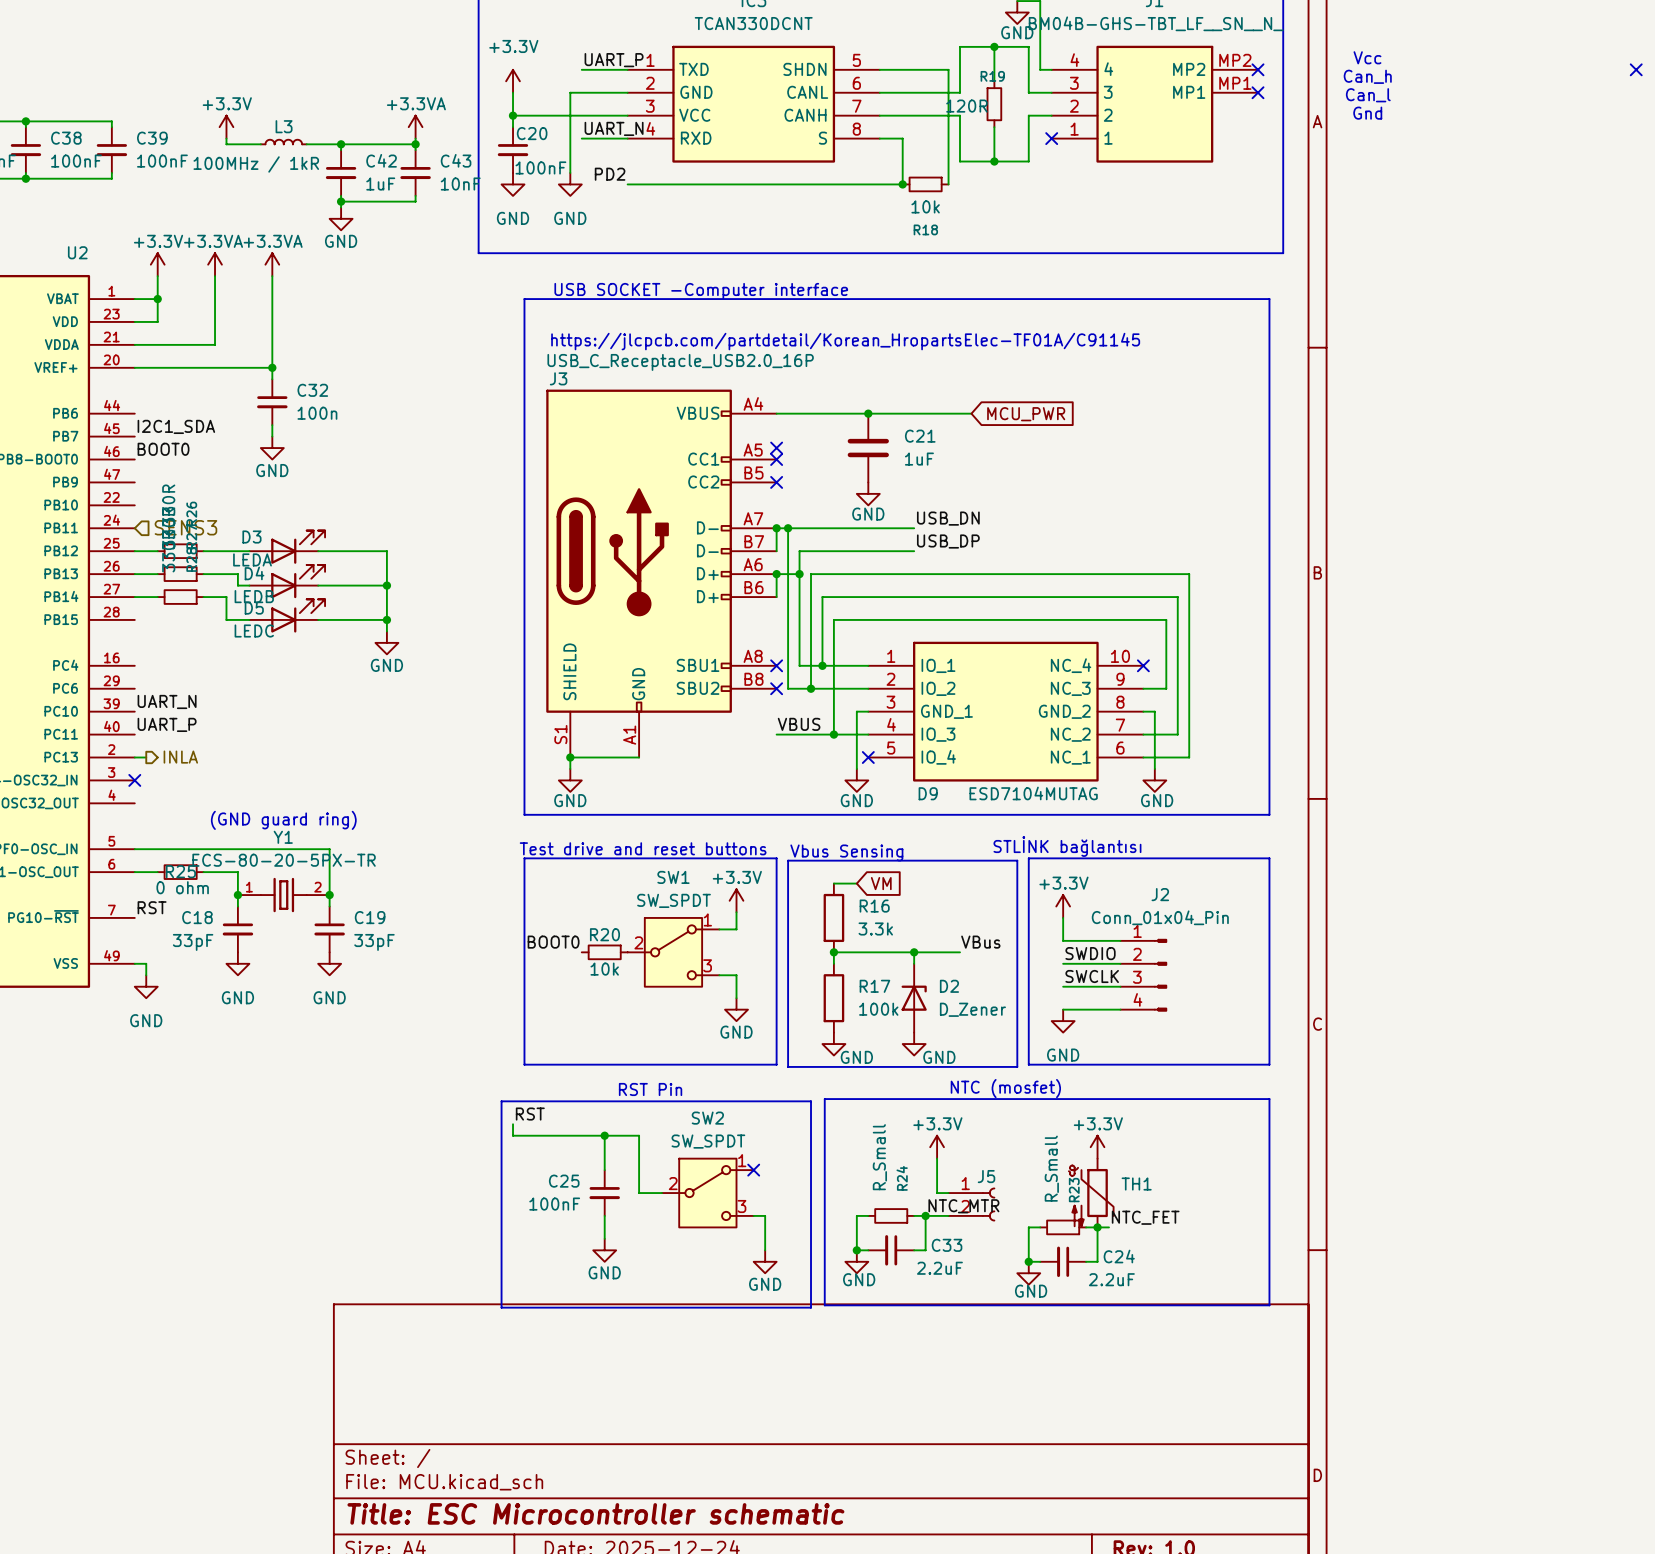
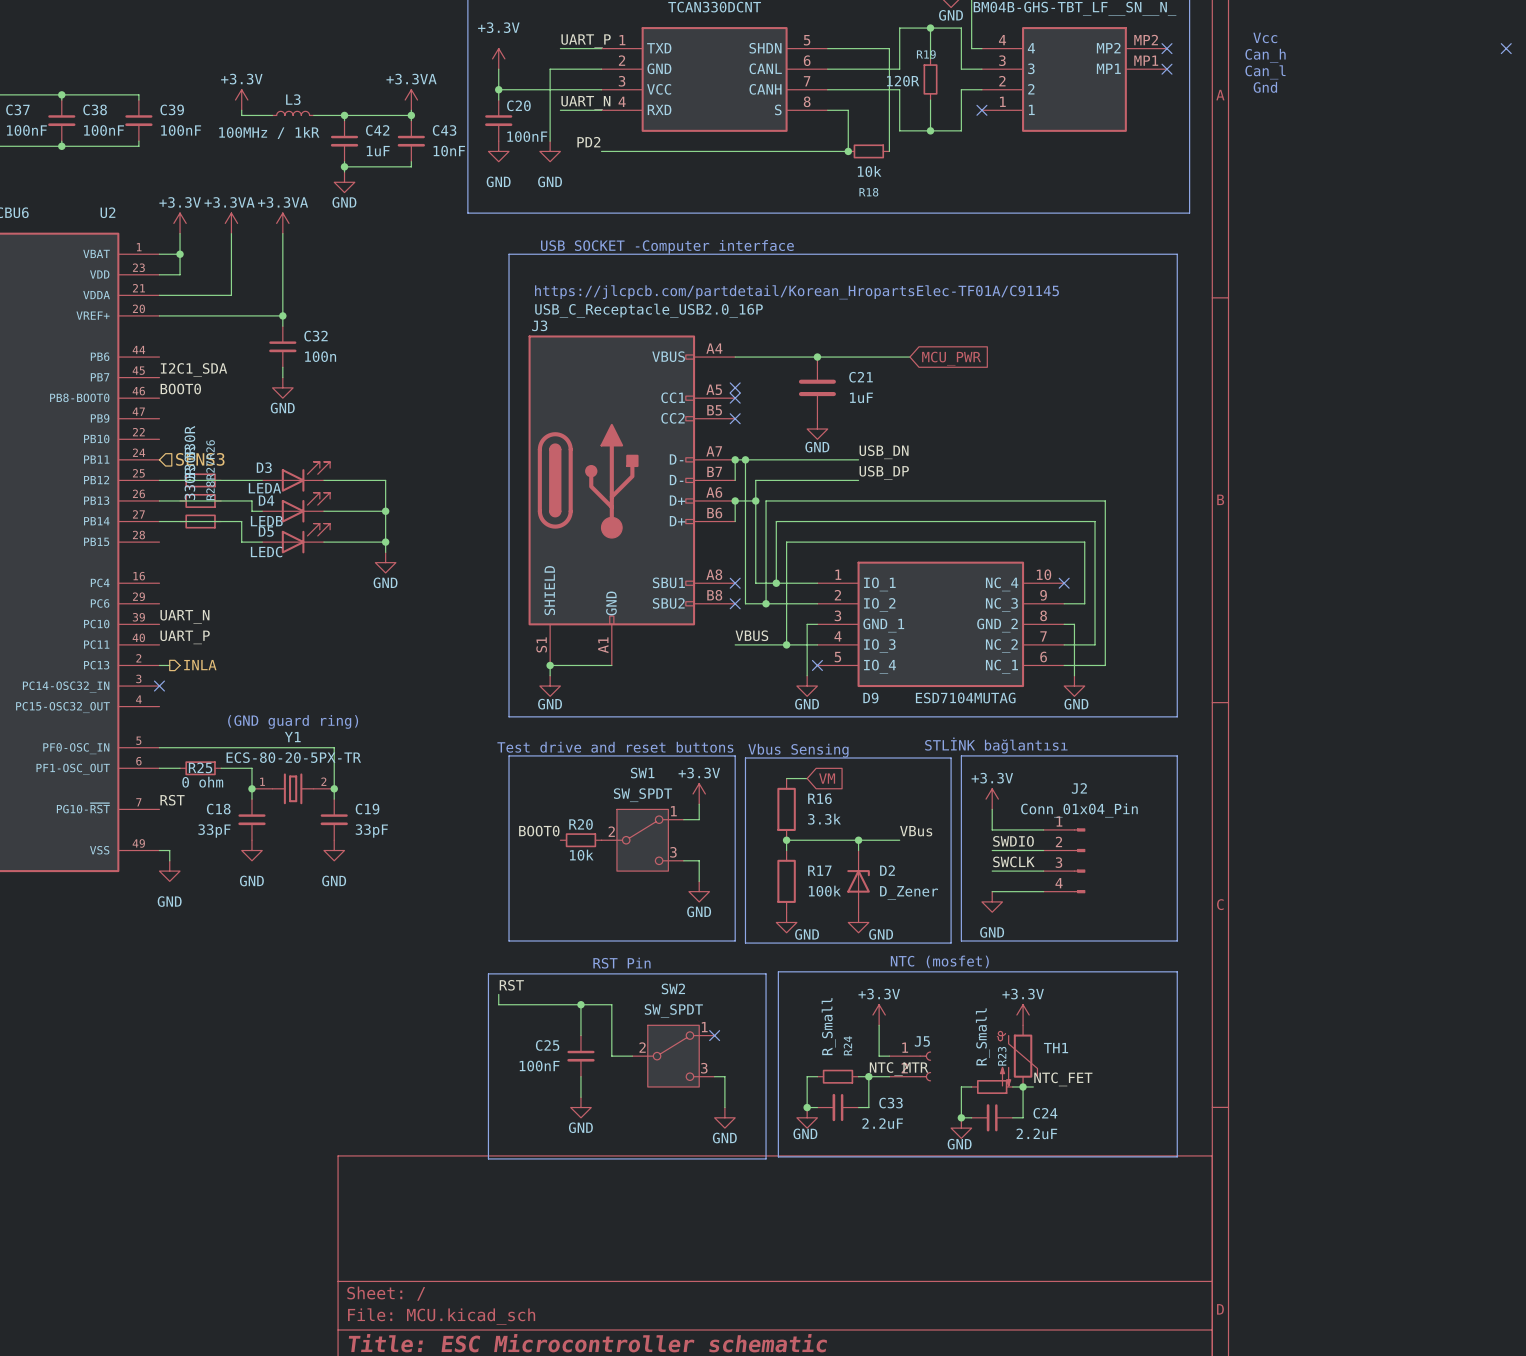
wire: none -> (180, 480) (221, 480)
wire: none -> (180, 500) (221, 500)
wire: none -> (180, 521) (221, 521)

